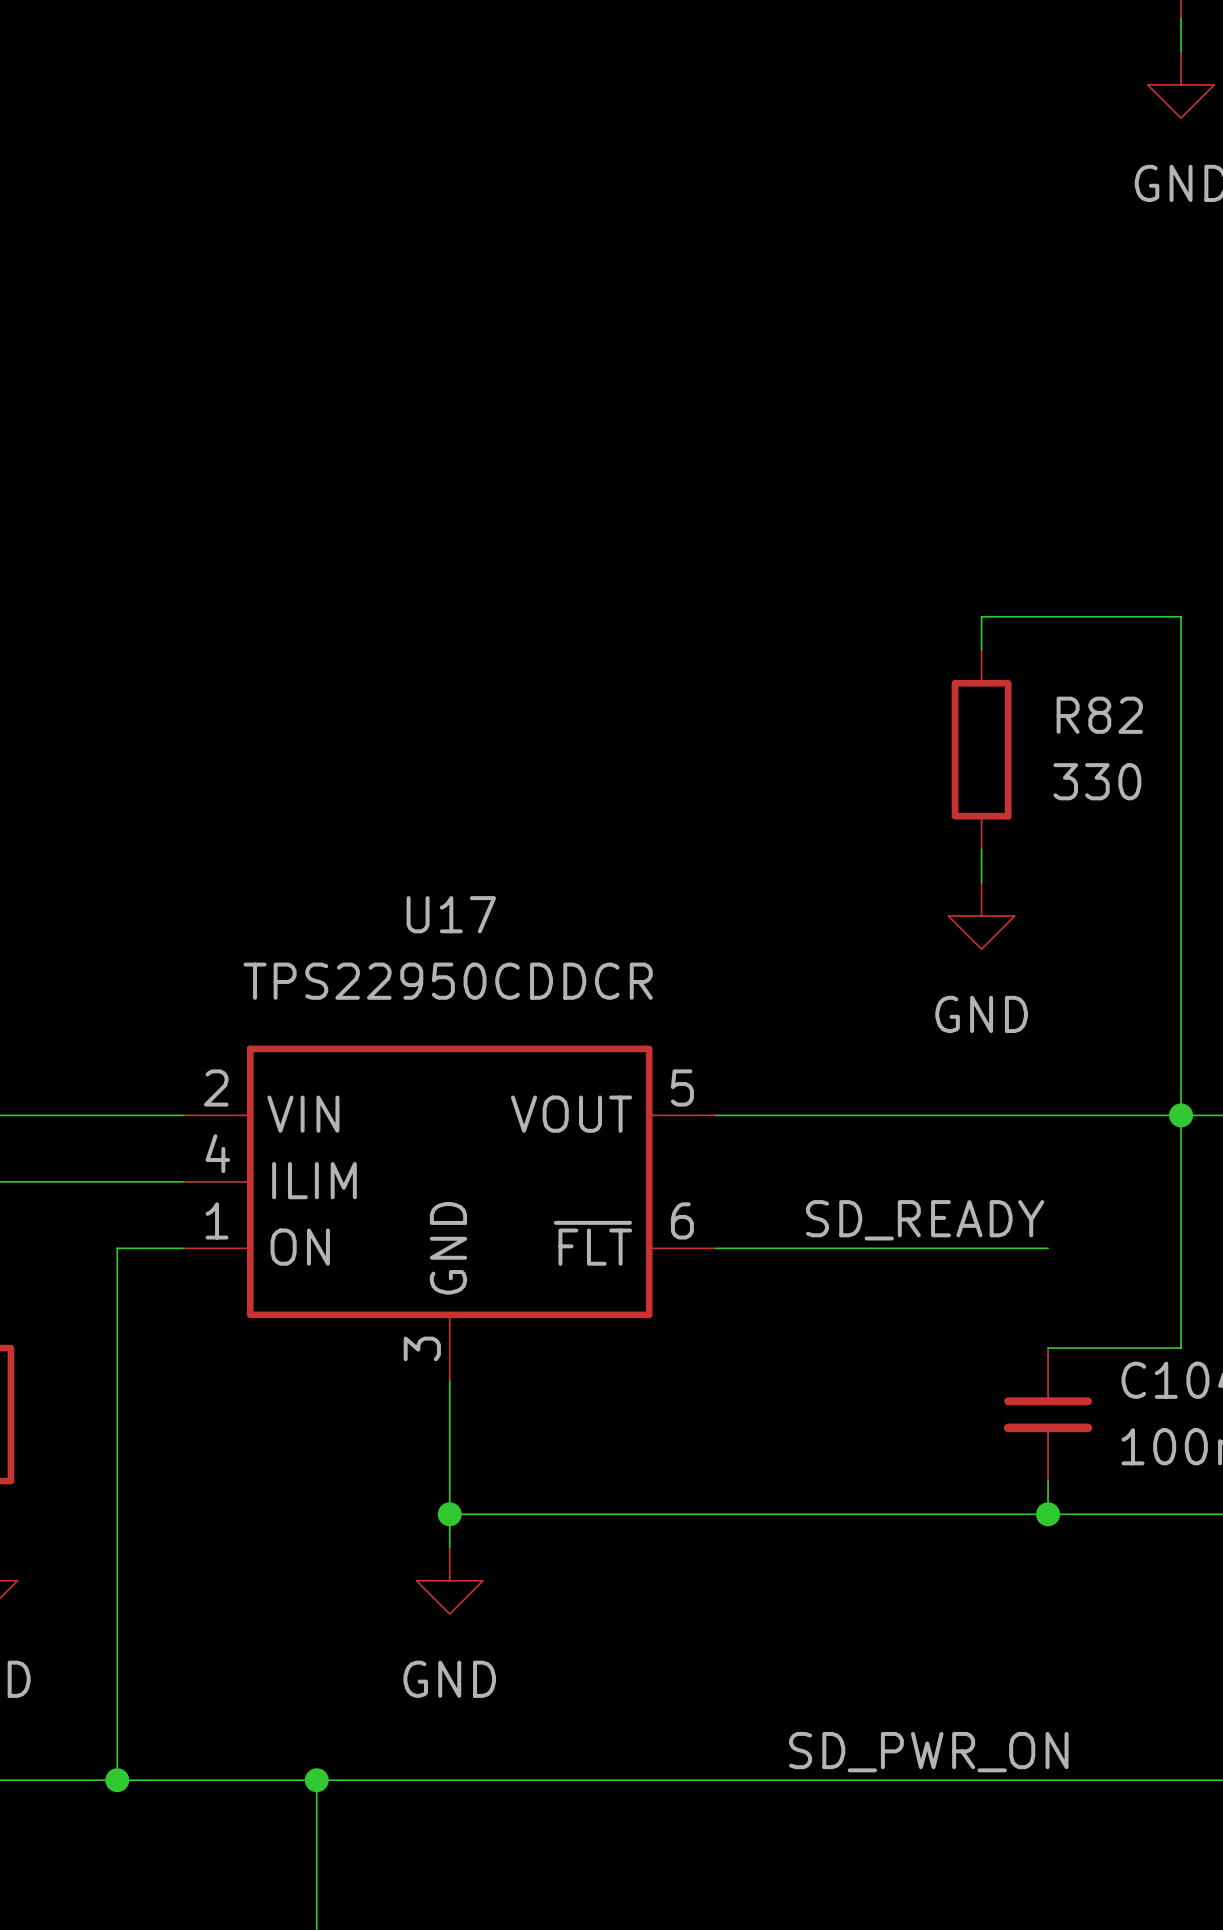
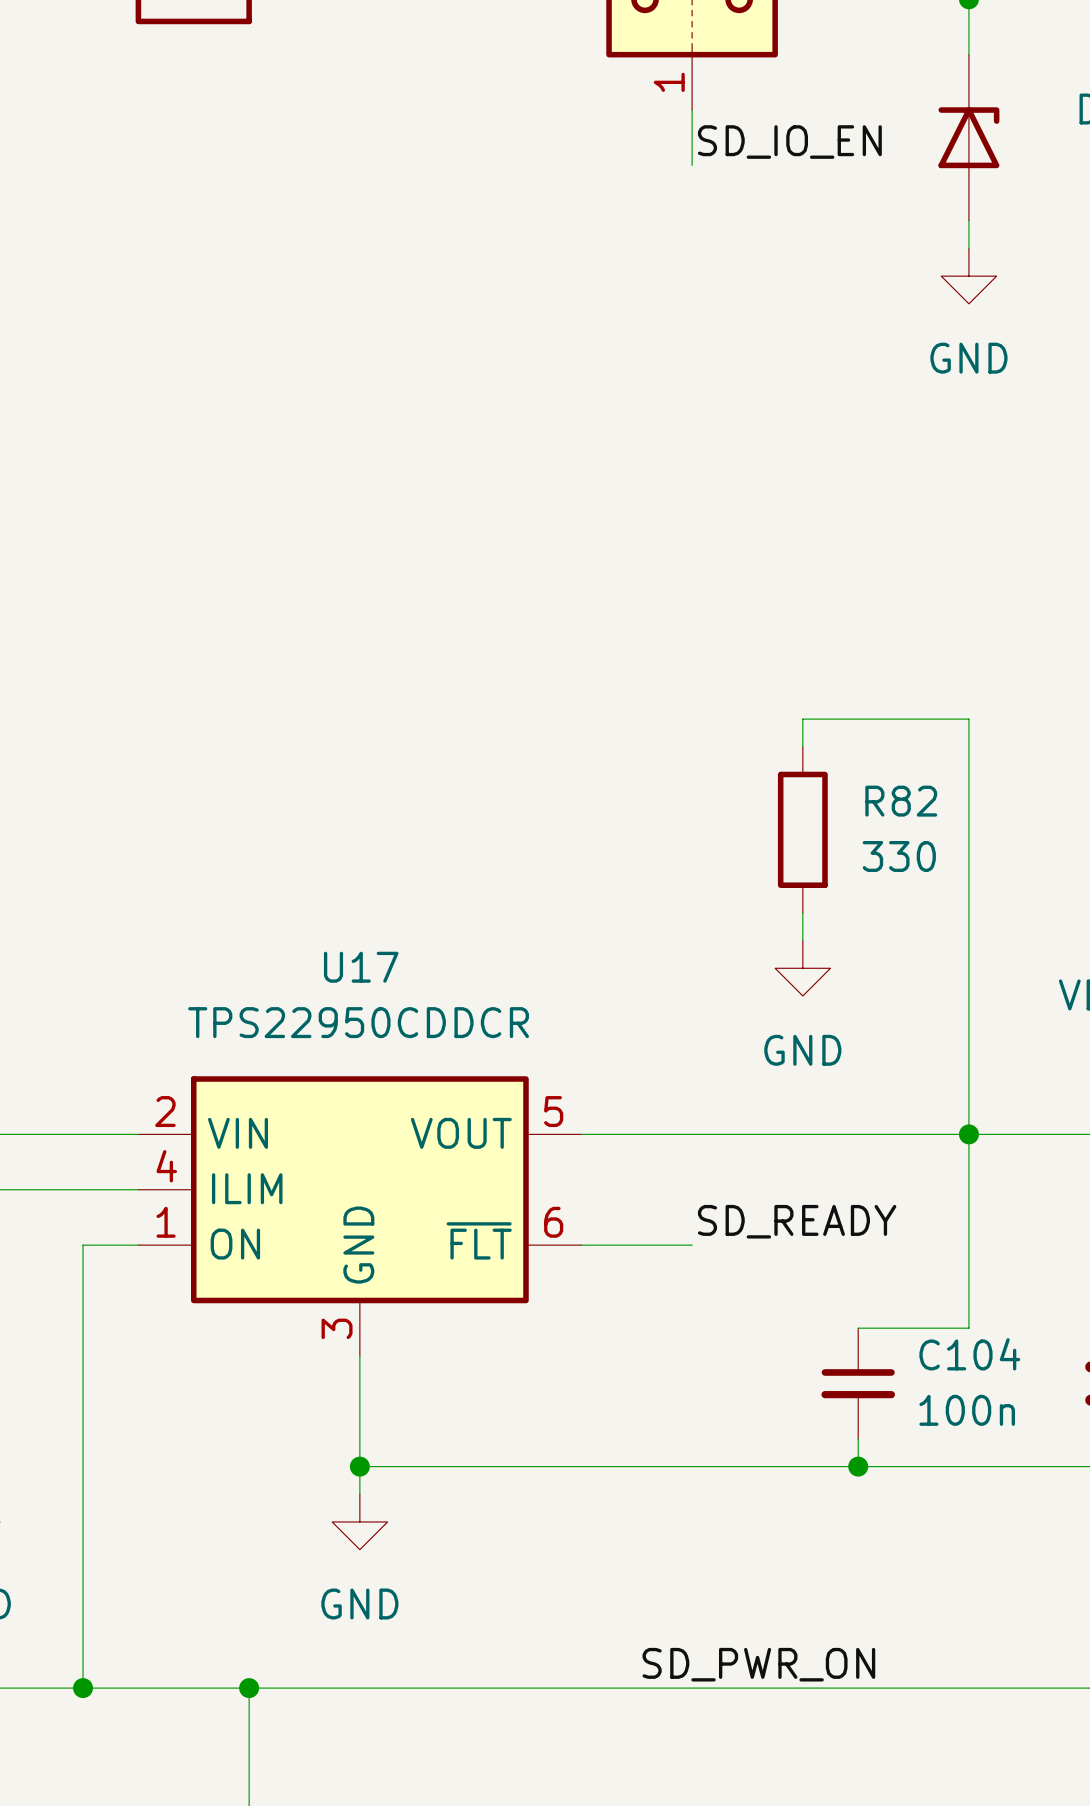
label position: SD_READY (925, 1220) -> SD_READY (797, 1221)
wire: (848, 1248) (1048, 1248) -> none

